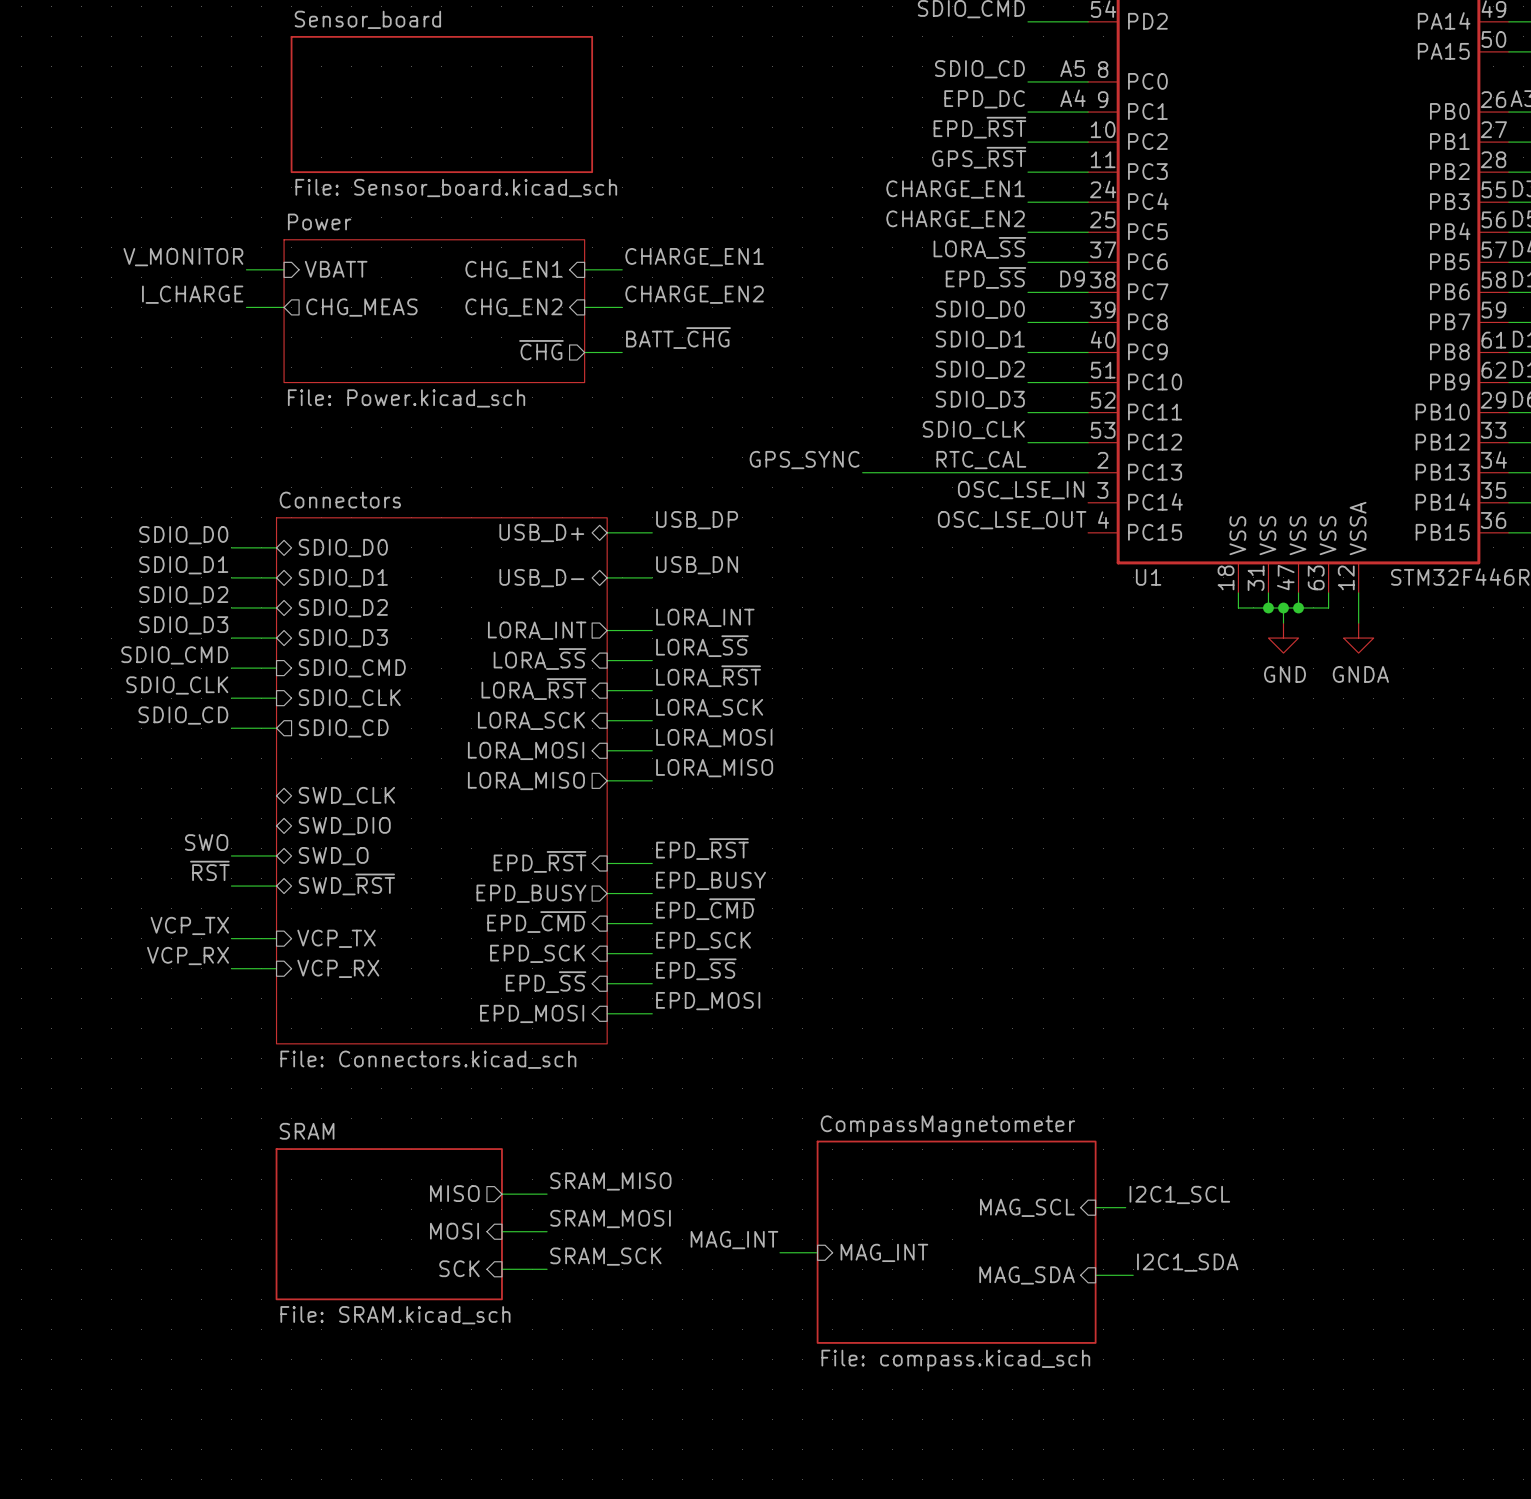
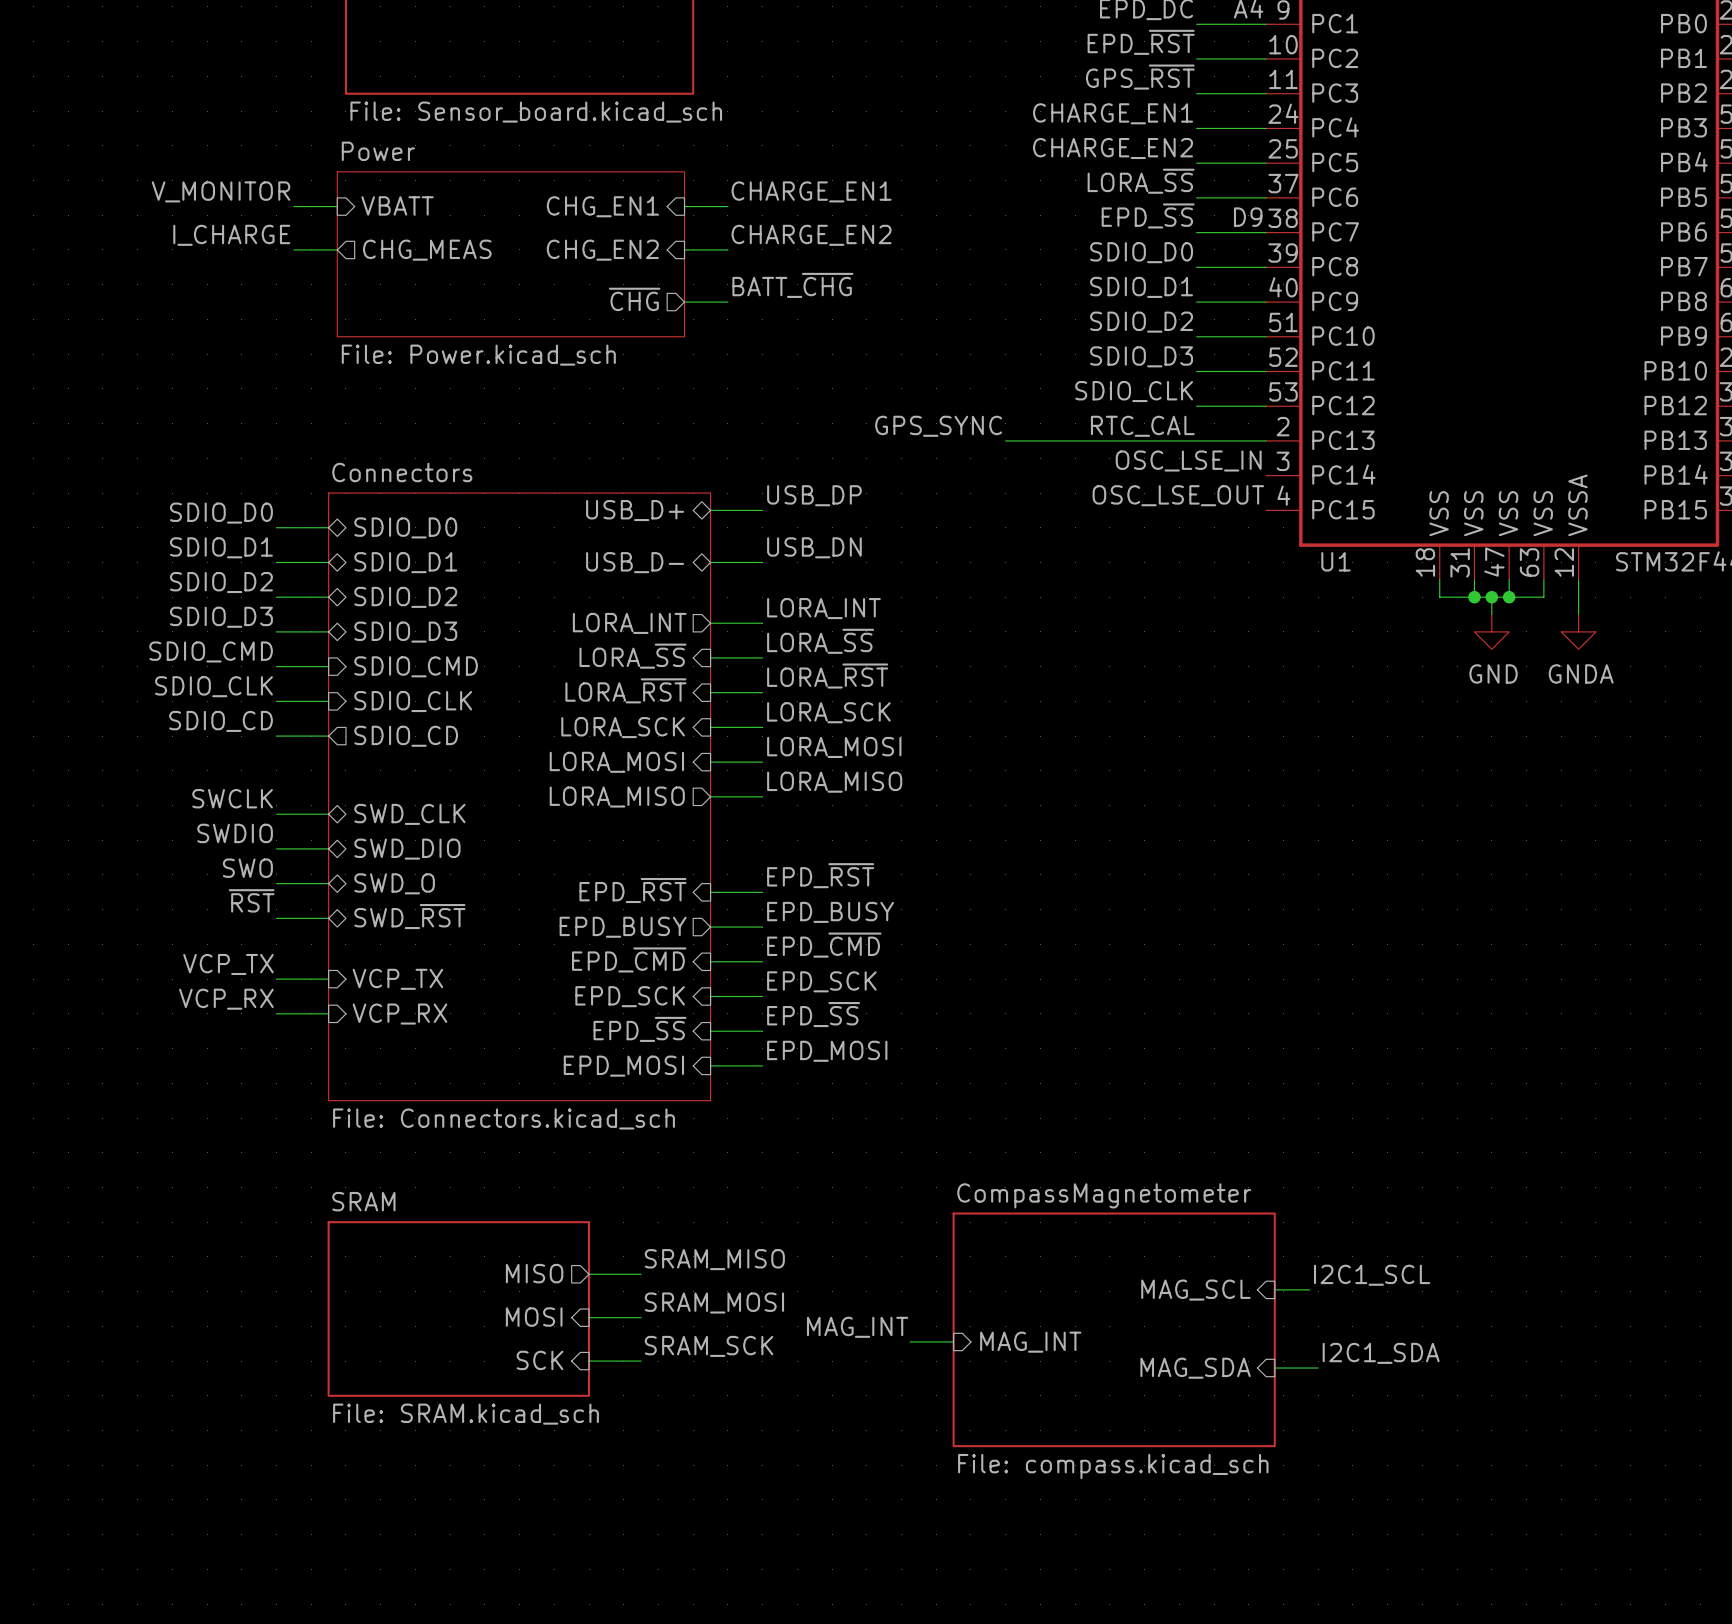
label: none -> SWCLK (232, 798)
wire: none -> (276, 814) (328, 814)
label: none -> SWDIO (235, 833)
wire: none -> (276, 848) (328, 848)

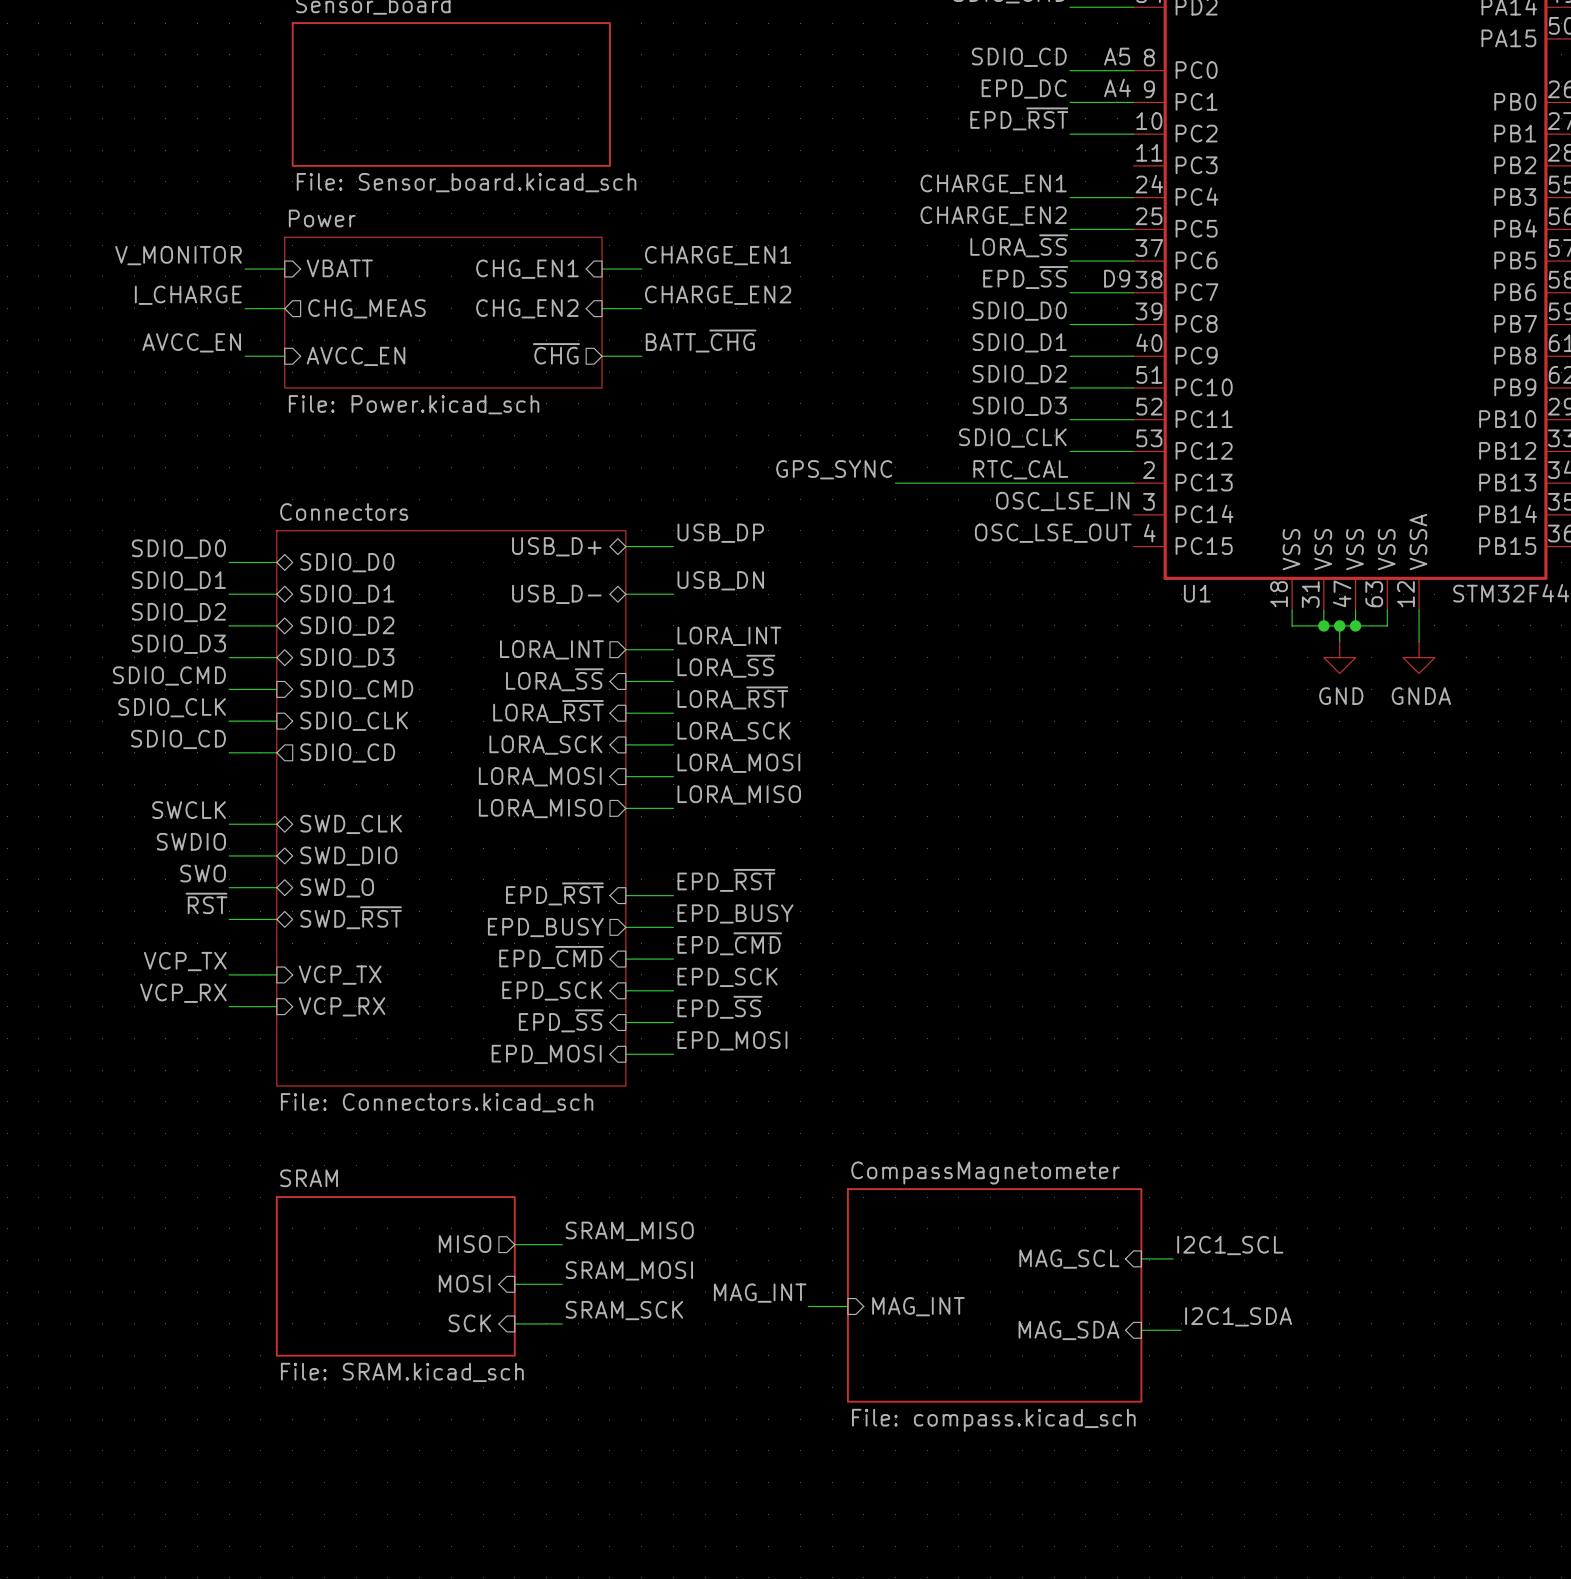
label: GPS_~{RST} (1140, 77) -> none
wire: (1196, 93) (1266, 93) -> none
label: none -> AVCC_EN (191, 342)
wire: none -> (245, 356) (284, 356)
sheet pin: none -> AVCC_EN (356, 356)

